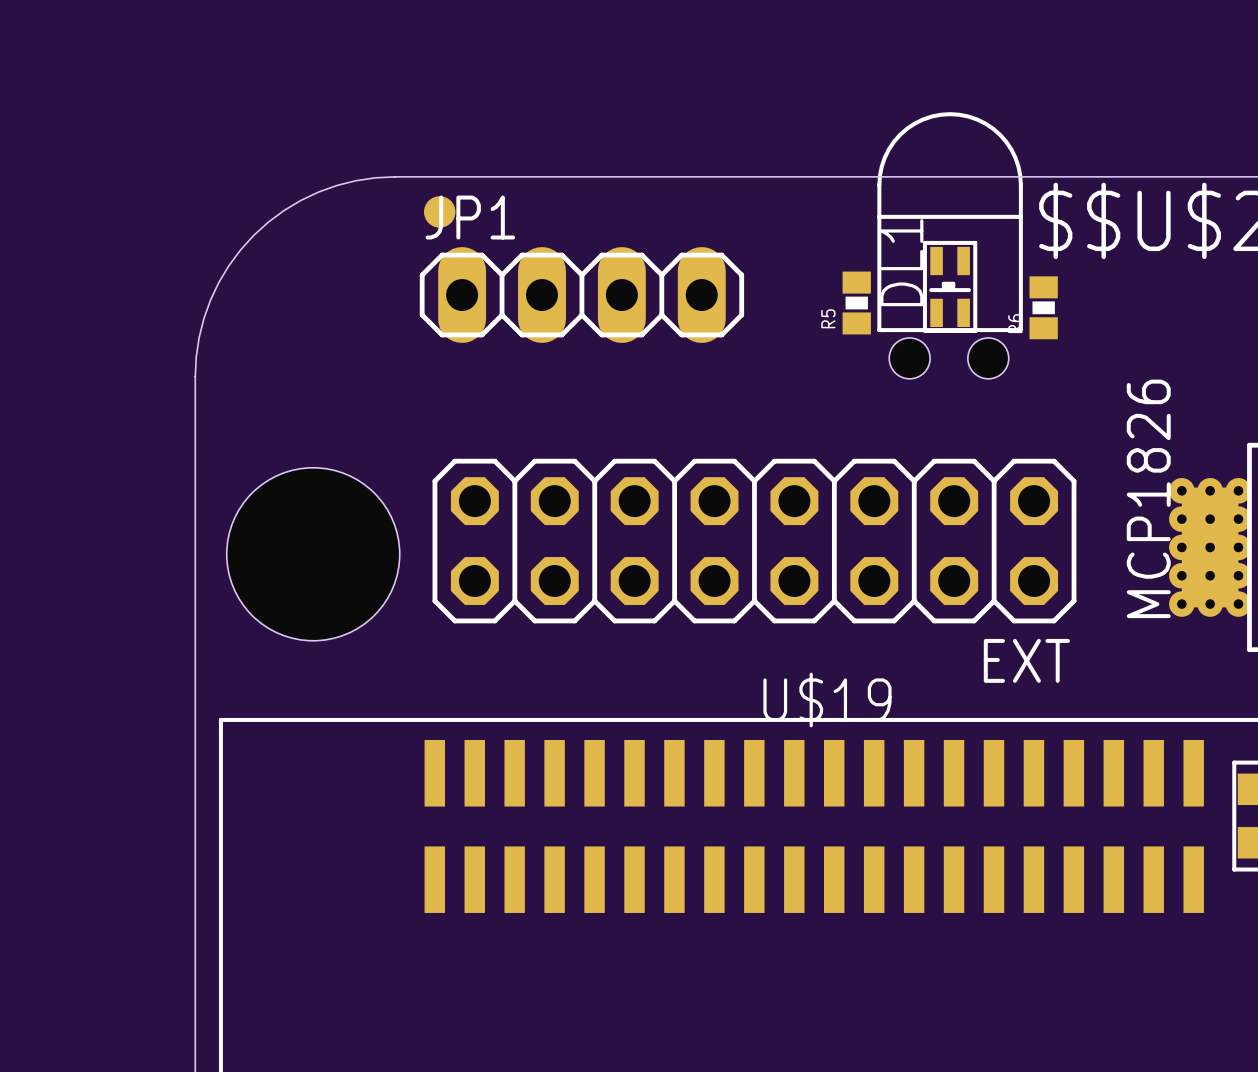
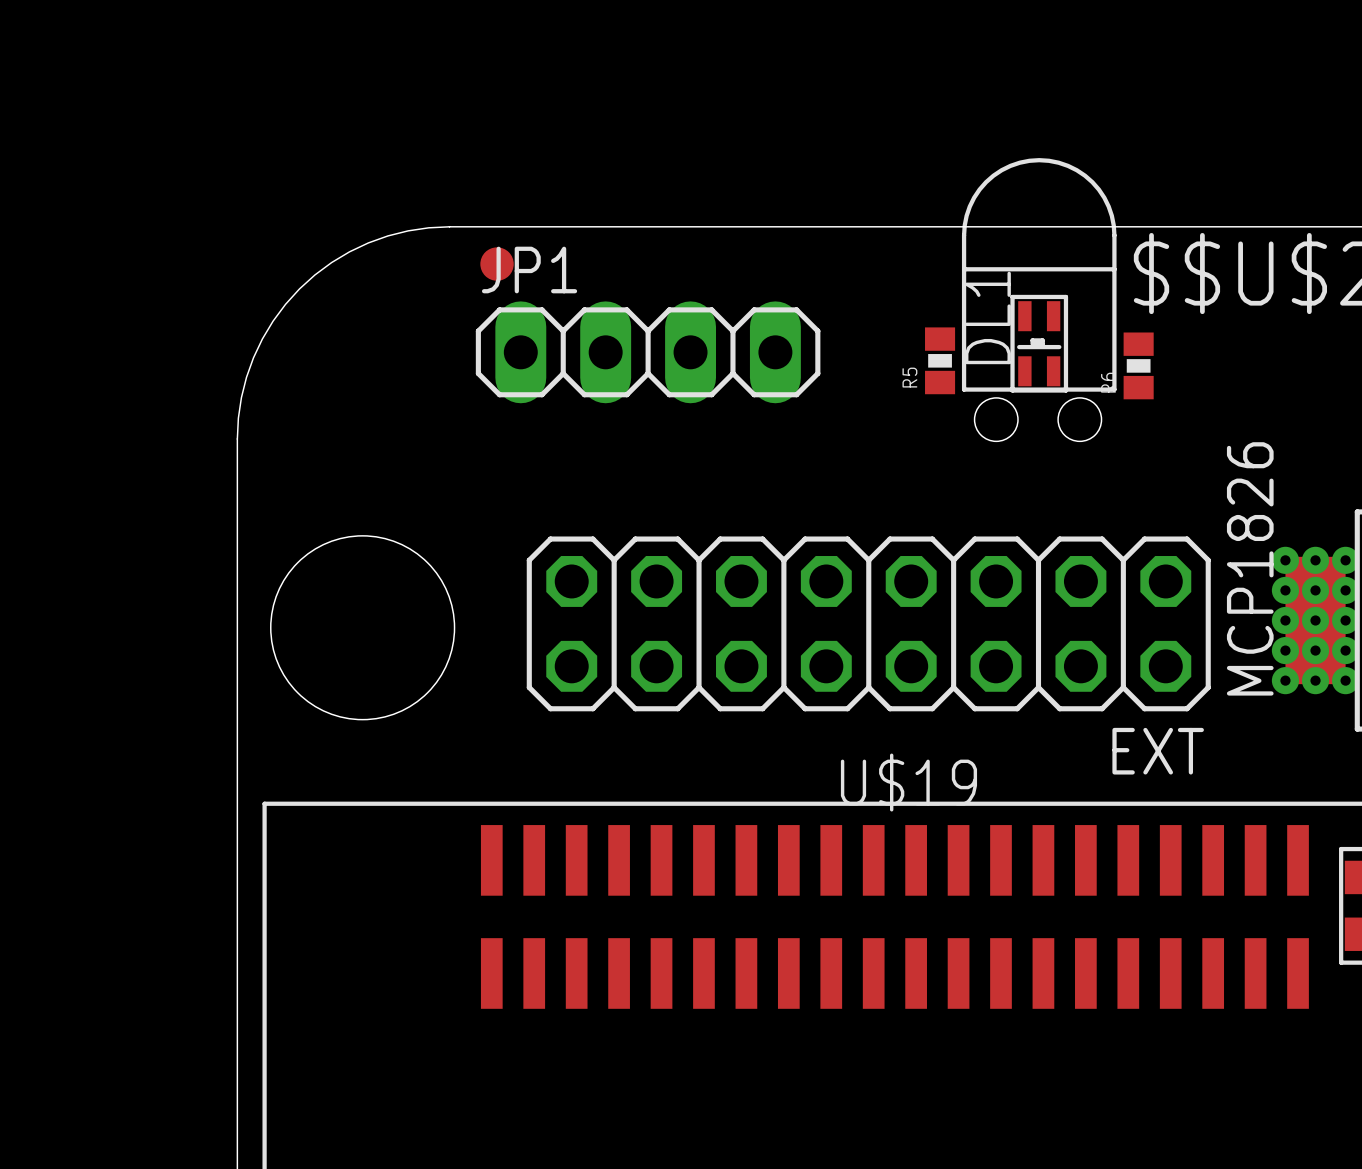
EXT position: (754, 541) -> (868, 623)

